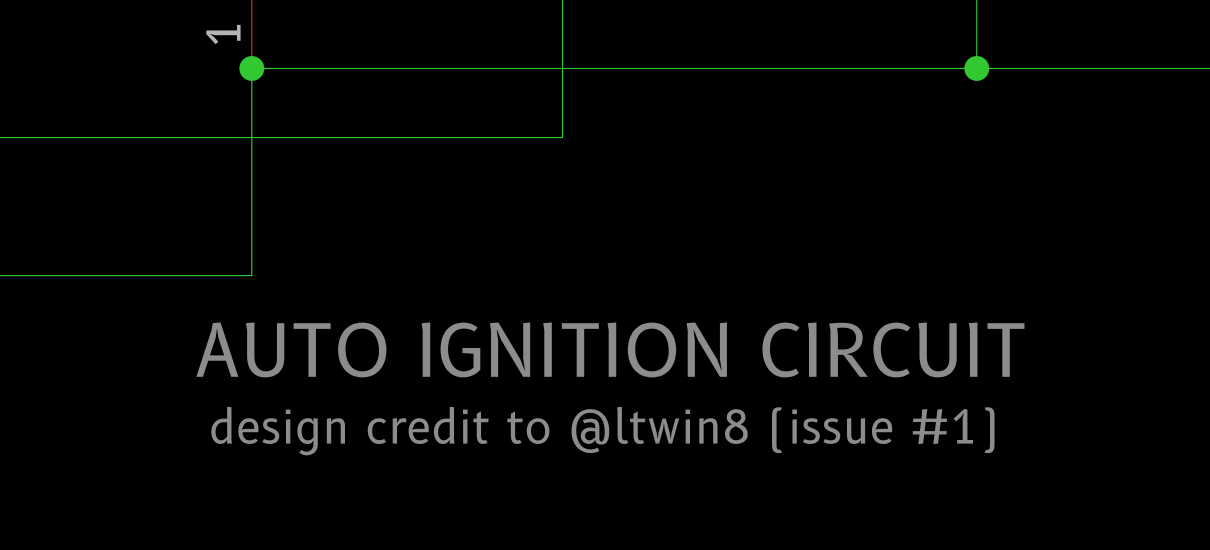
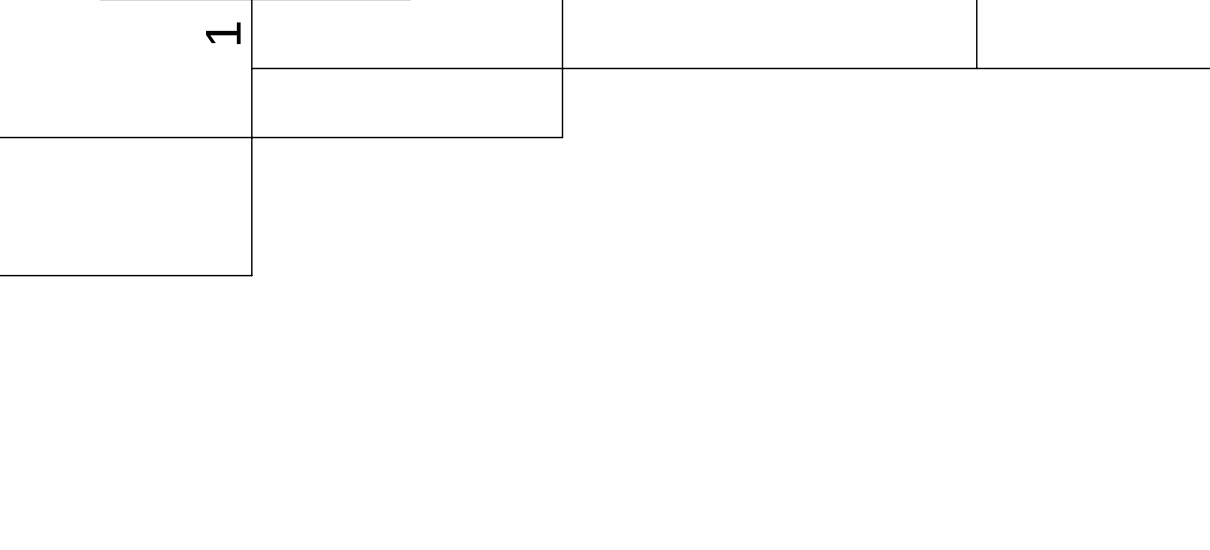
junction: (251, 68) -> none
junction: (976, 68) -> none
text: AUTO IGNITION CIRCUIT (610, 349) -> none
text: design credit to @ltwin8 (issue #1) (602, 431) -> none

